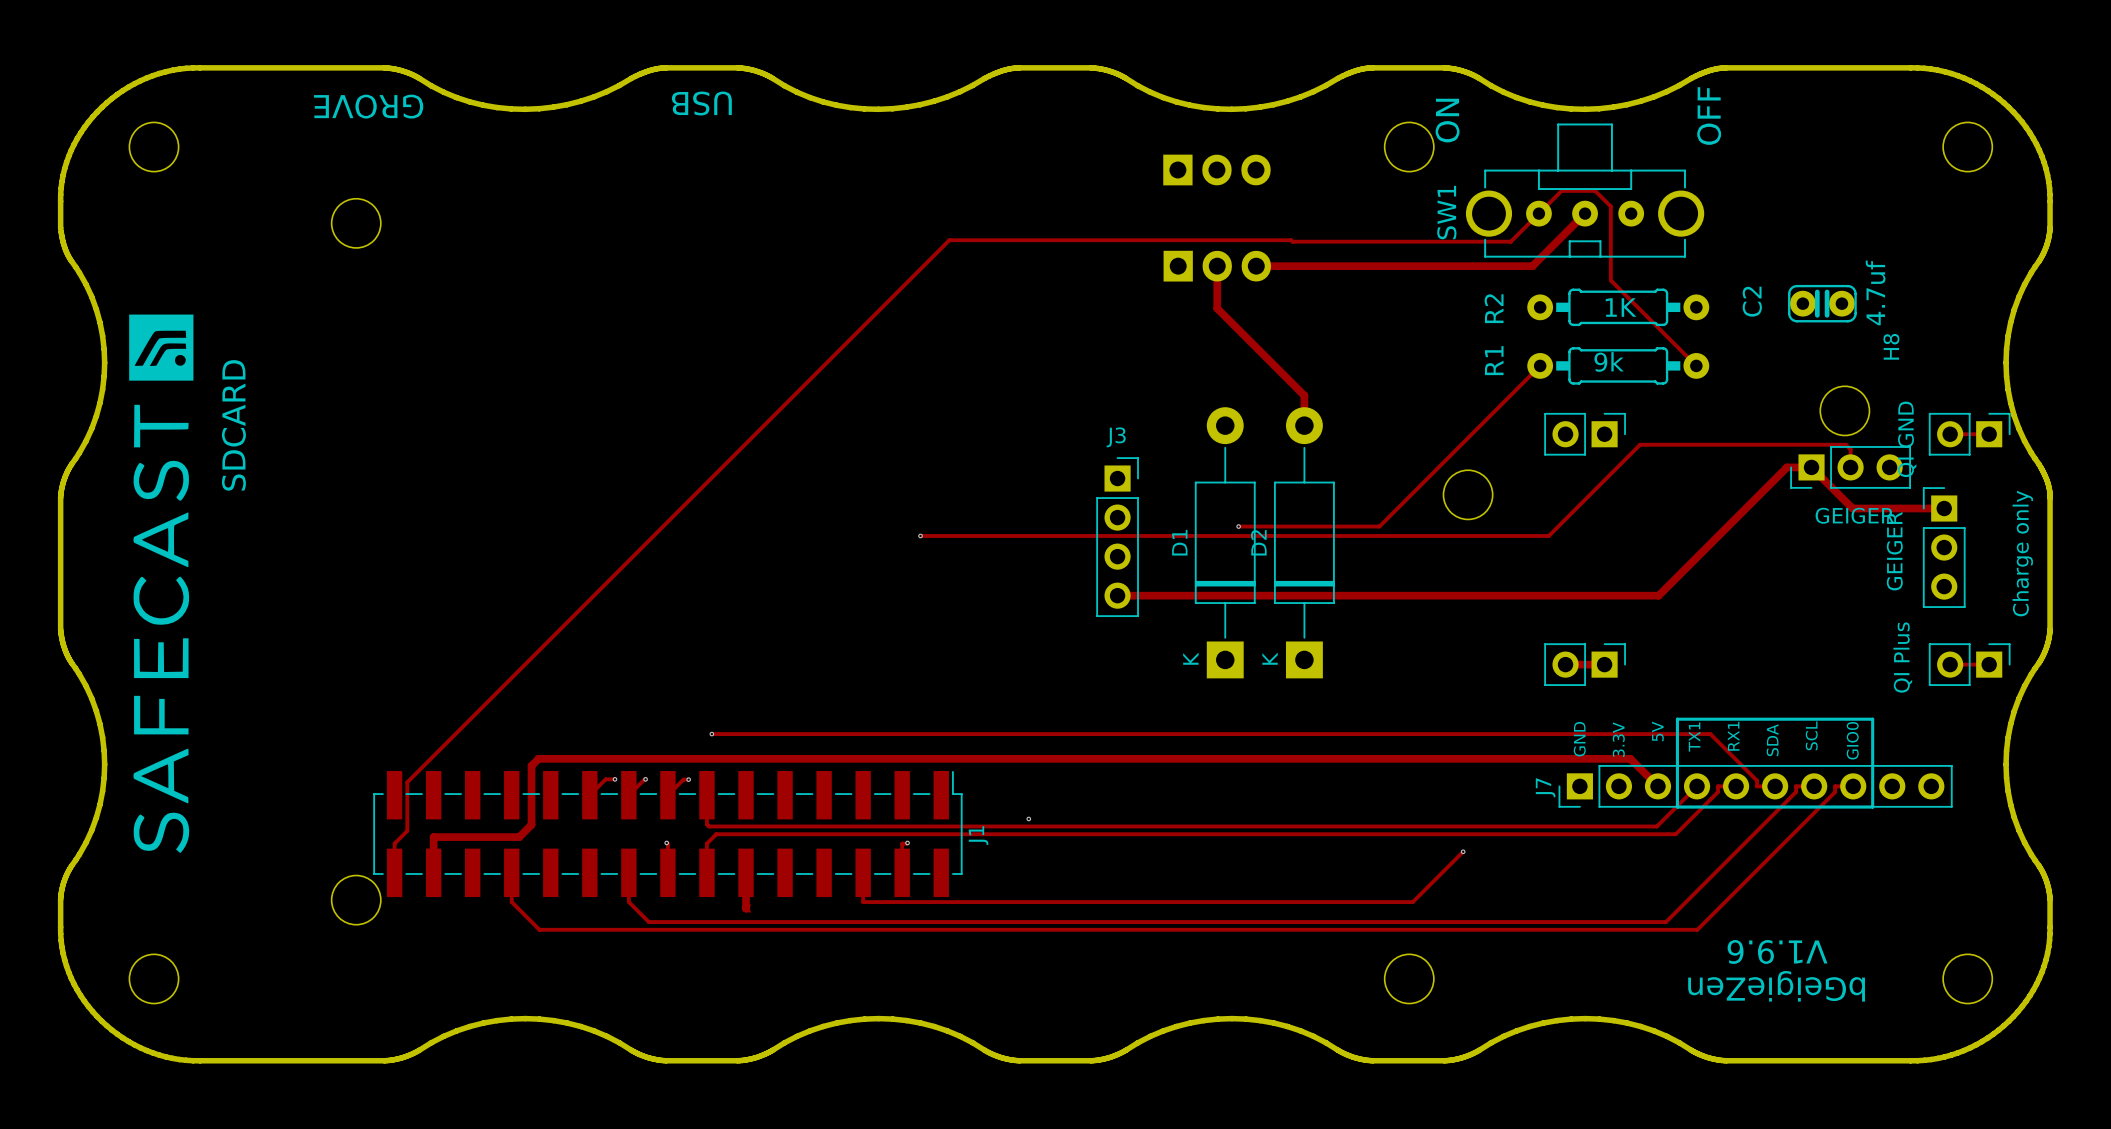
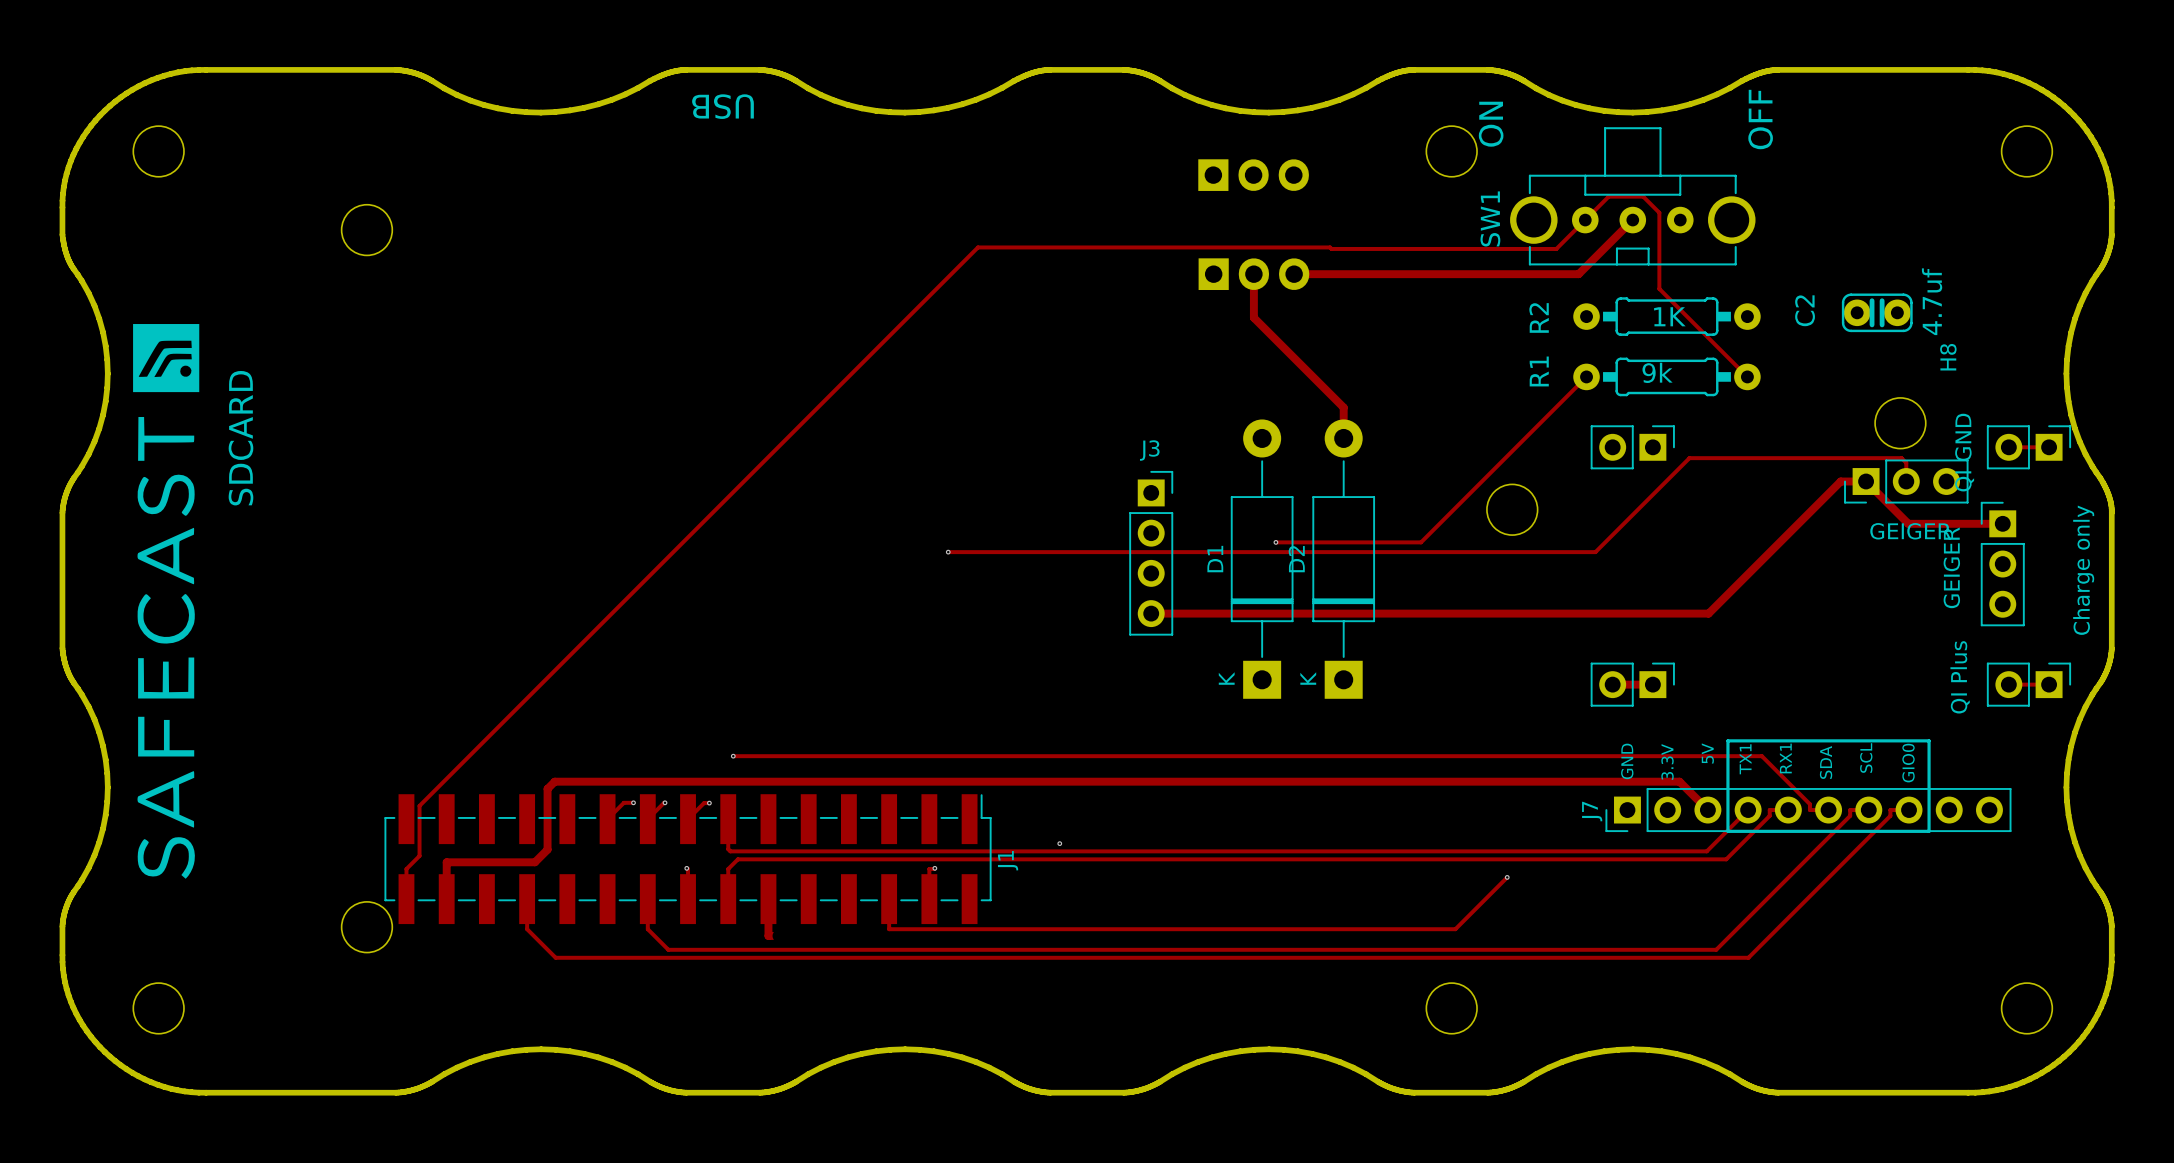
text: GROVE (368, 106) -> none
text: V1.9.6 (1777, 951) -> none
text: bGeigieZen (1776, 986) -> none

